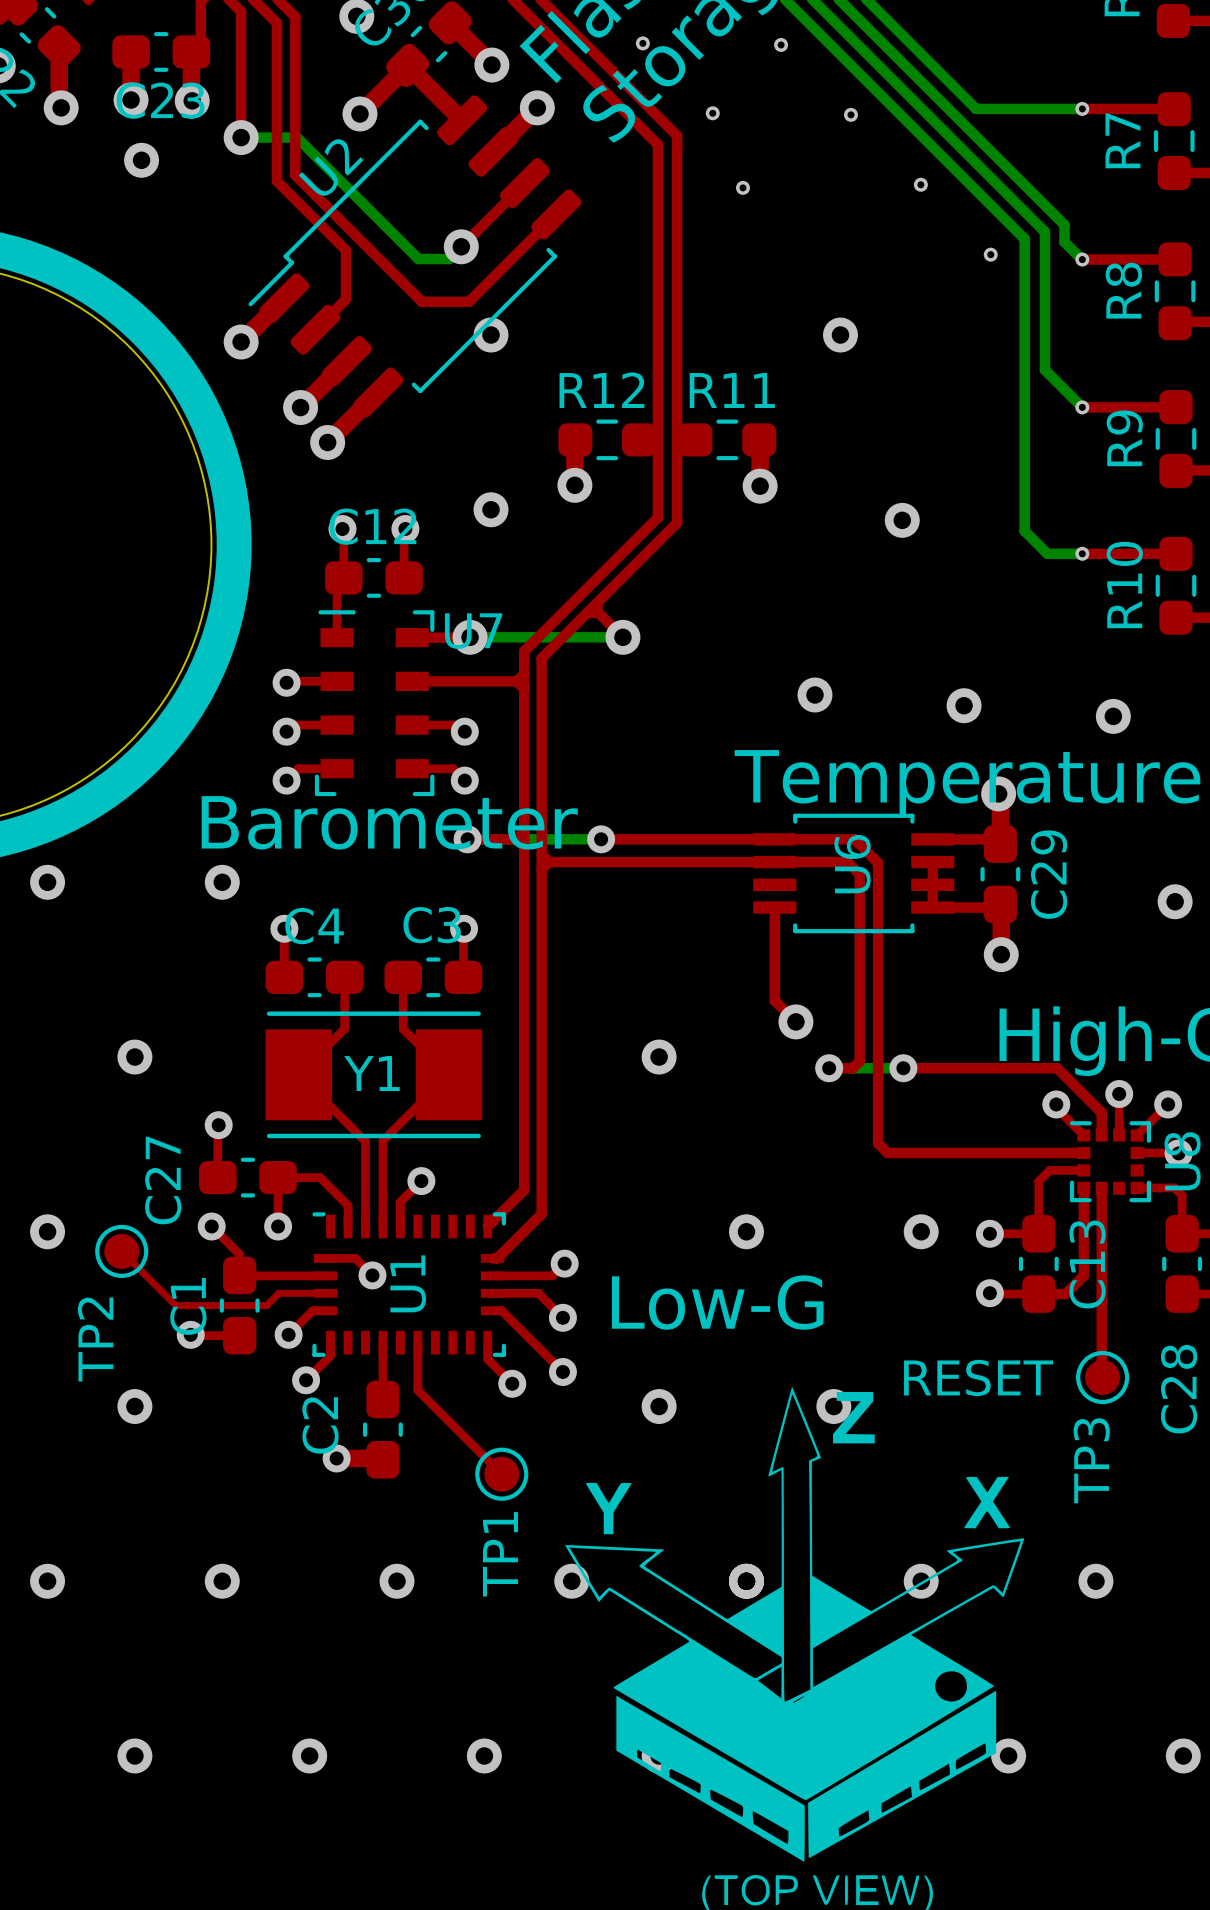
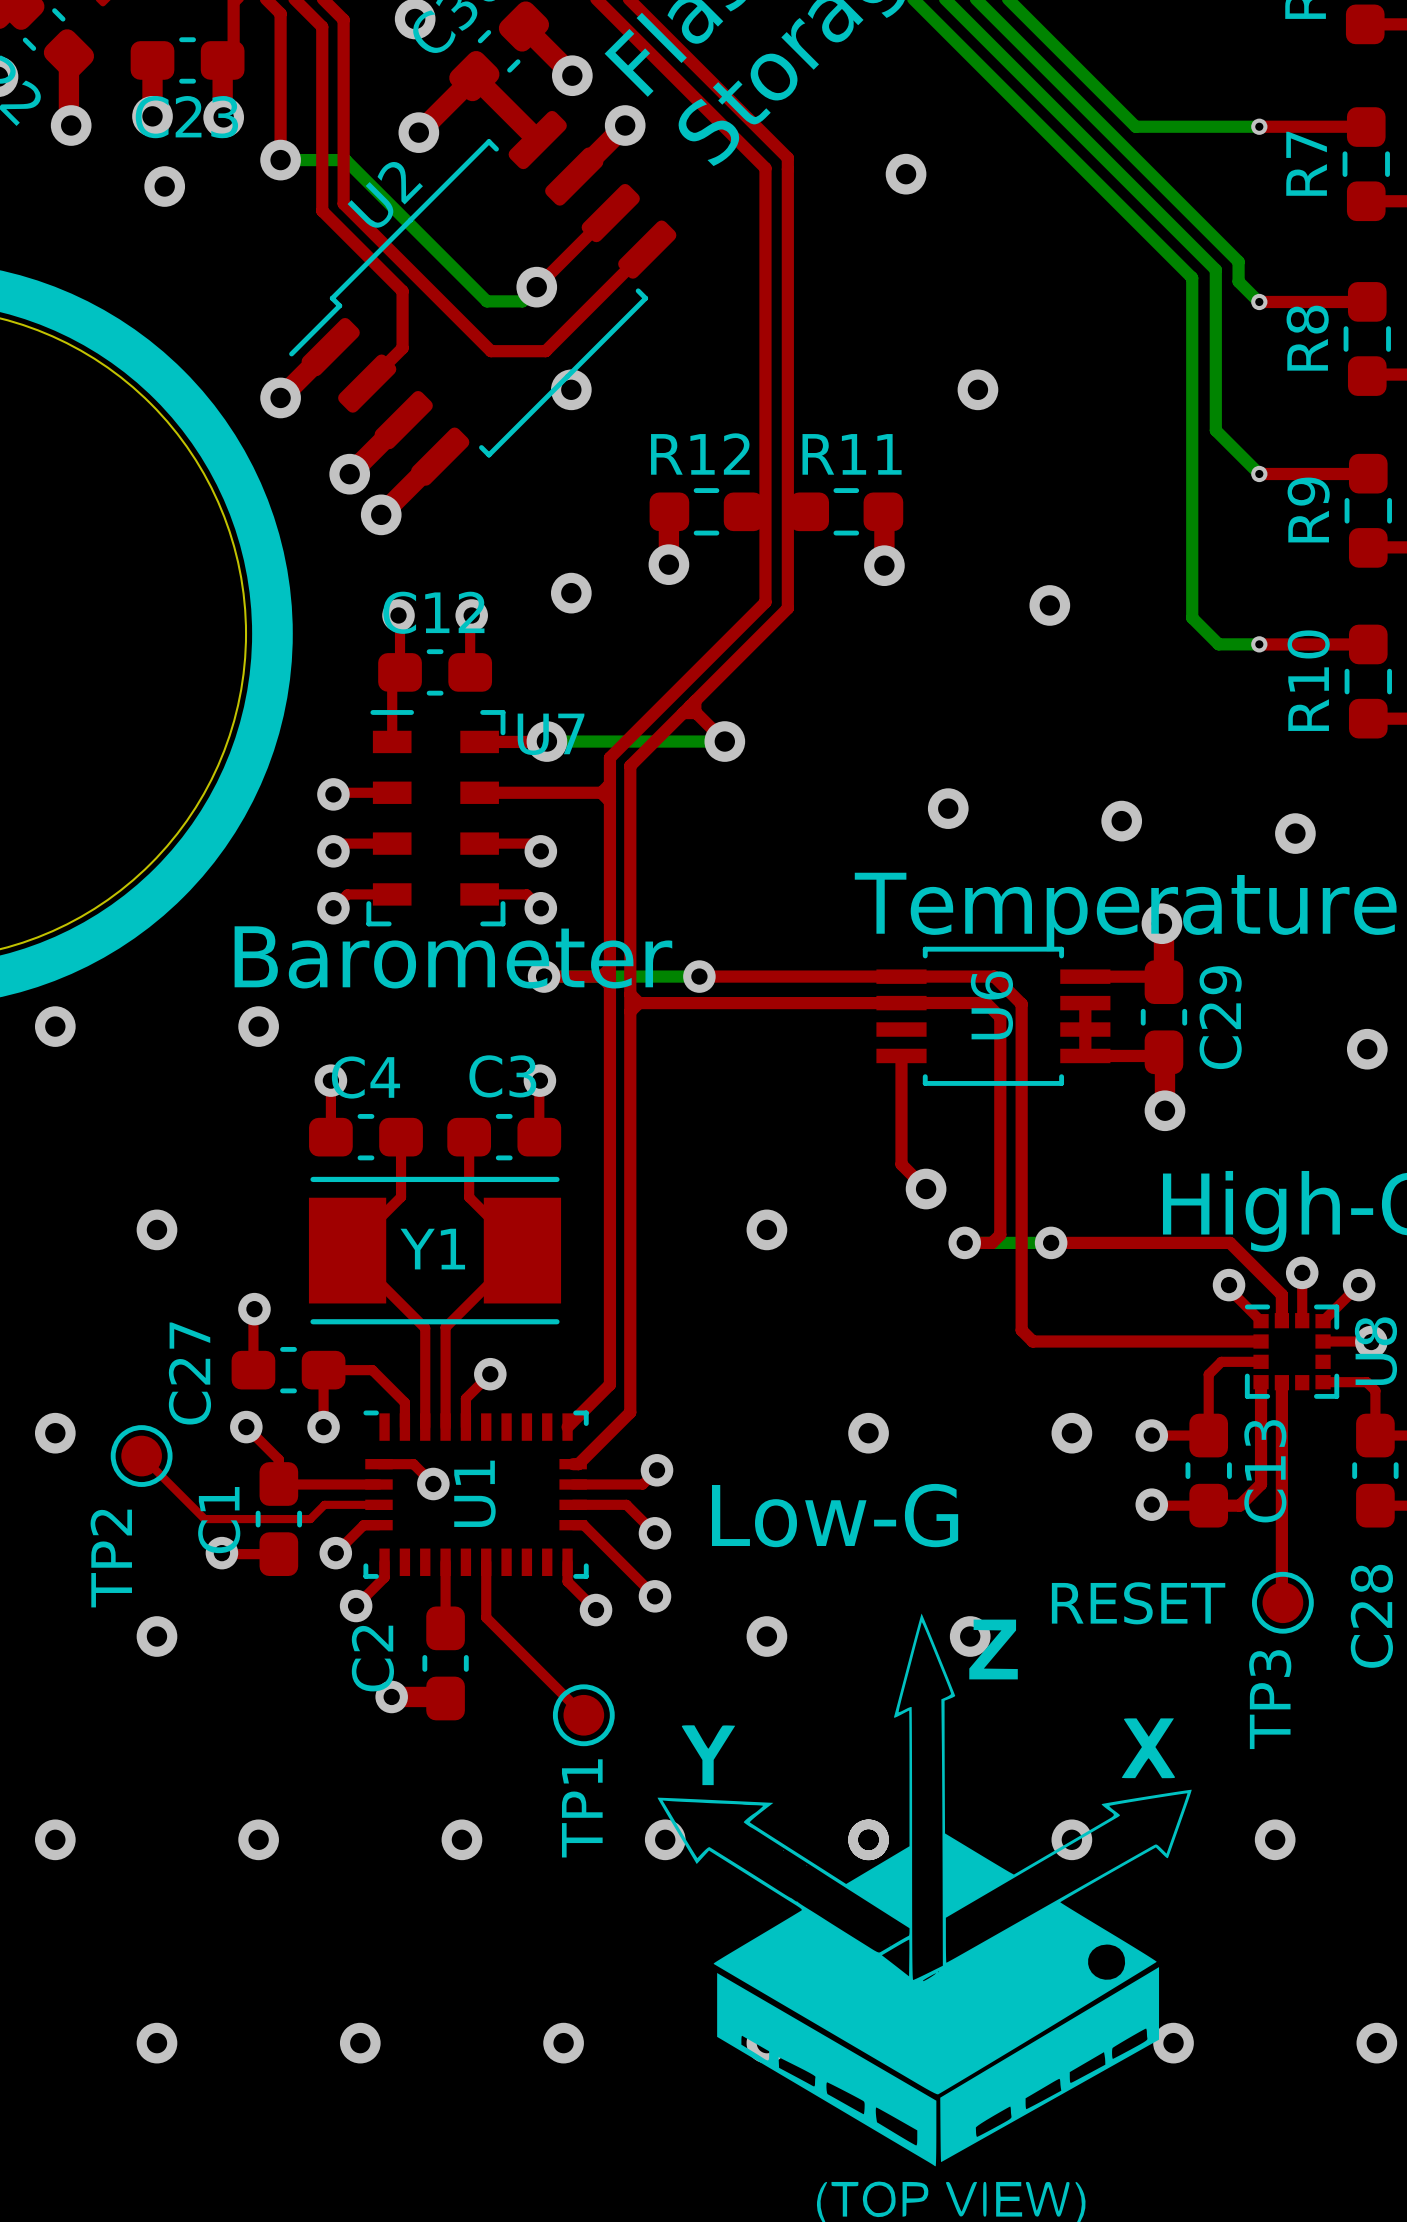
via: (642, 43) -> none
via: (781, 44) -> none
via: (712, 113) -> none
via: (850, 114) -> none
via: none -> (906, 174)
via: (920, 184) -> none
via: (742, 187) -> none
via: (990, 254) -> none

